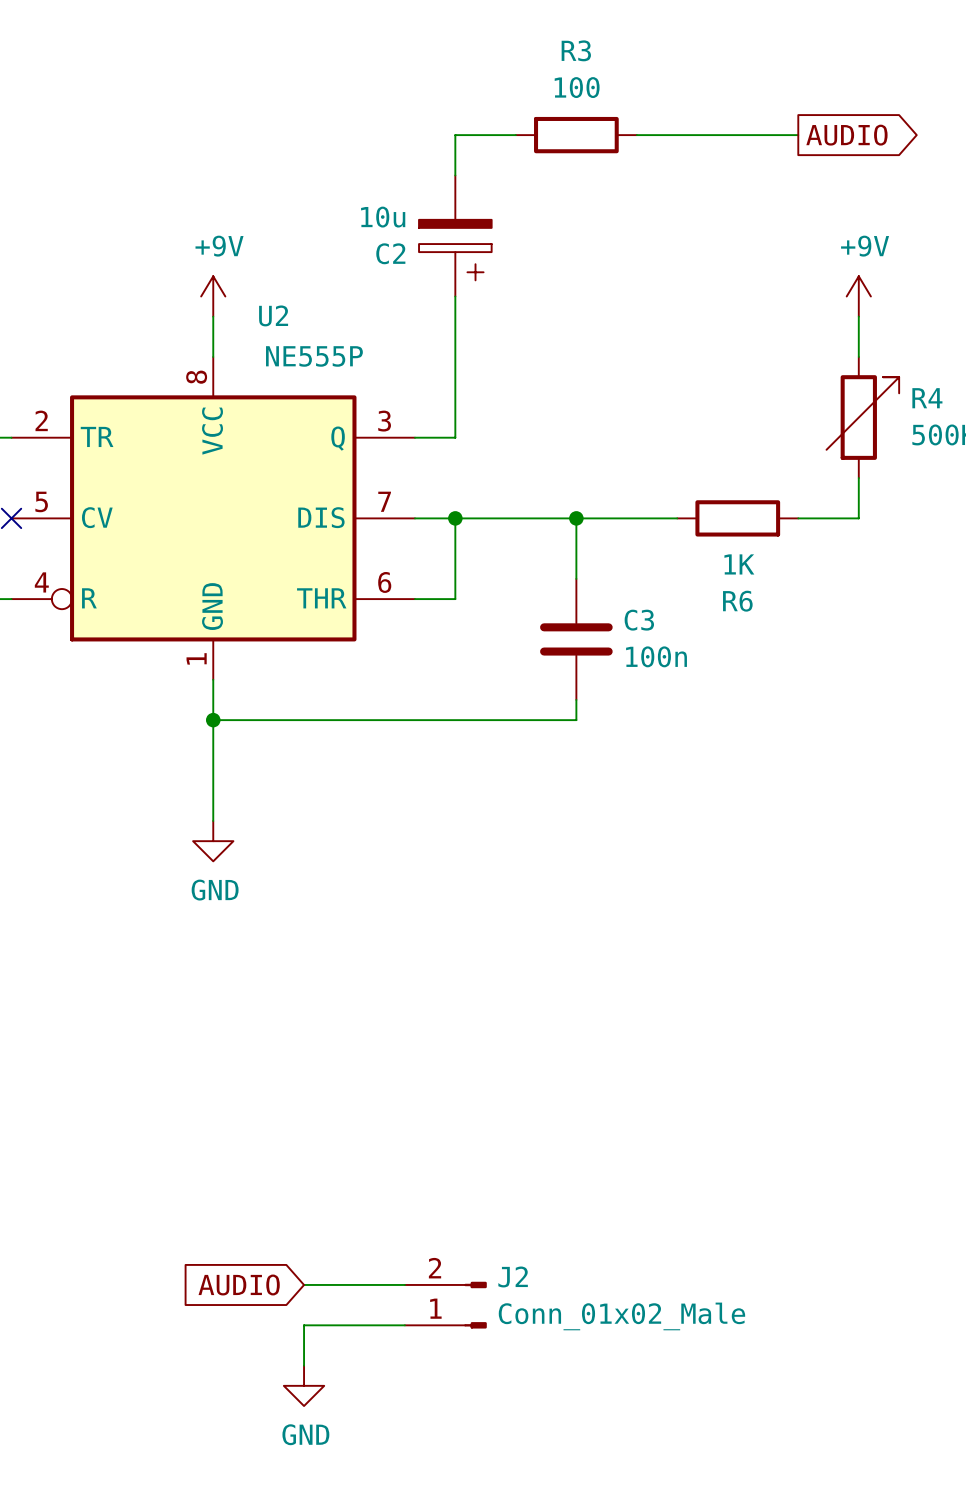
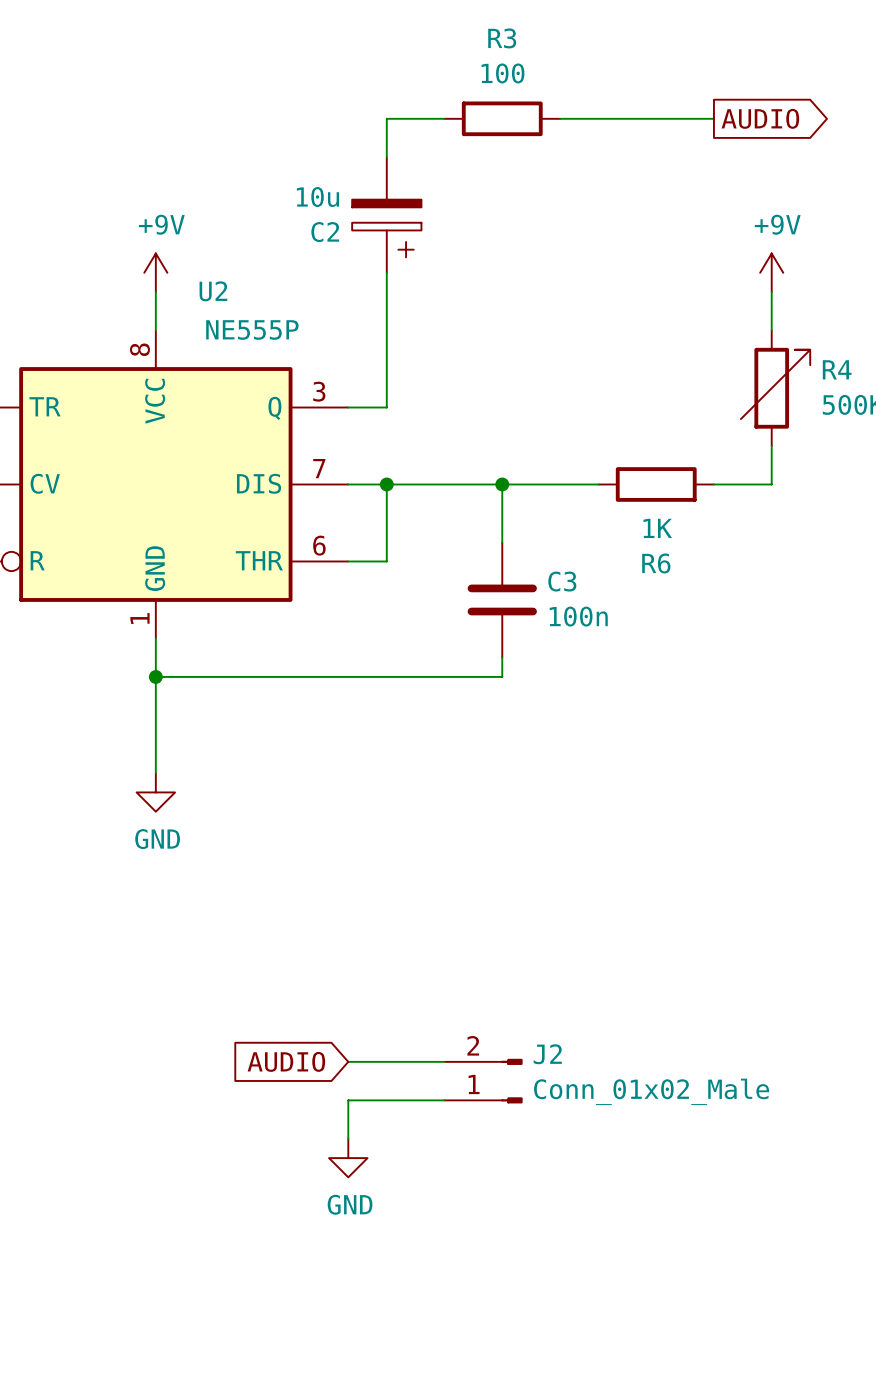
global label position: AUDIO (239, 1284) -> AUDIO (286, 1061)
wire: (304, 1284) (404, 1284) -> (348, 1061) (444, 1061)
J2 position: (445, 1305) -> (483, 1081)
wire: (404, 1325) (304, 1325) (304, 1365) -> (444, 1100) (348, 1100) (348, 1138)
power symbol position: GND (304, 1385) -> GND (348, 1158)

